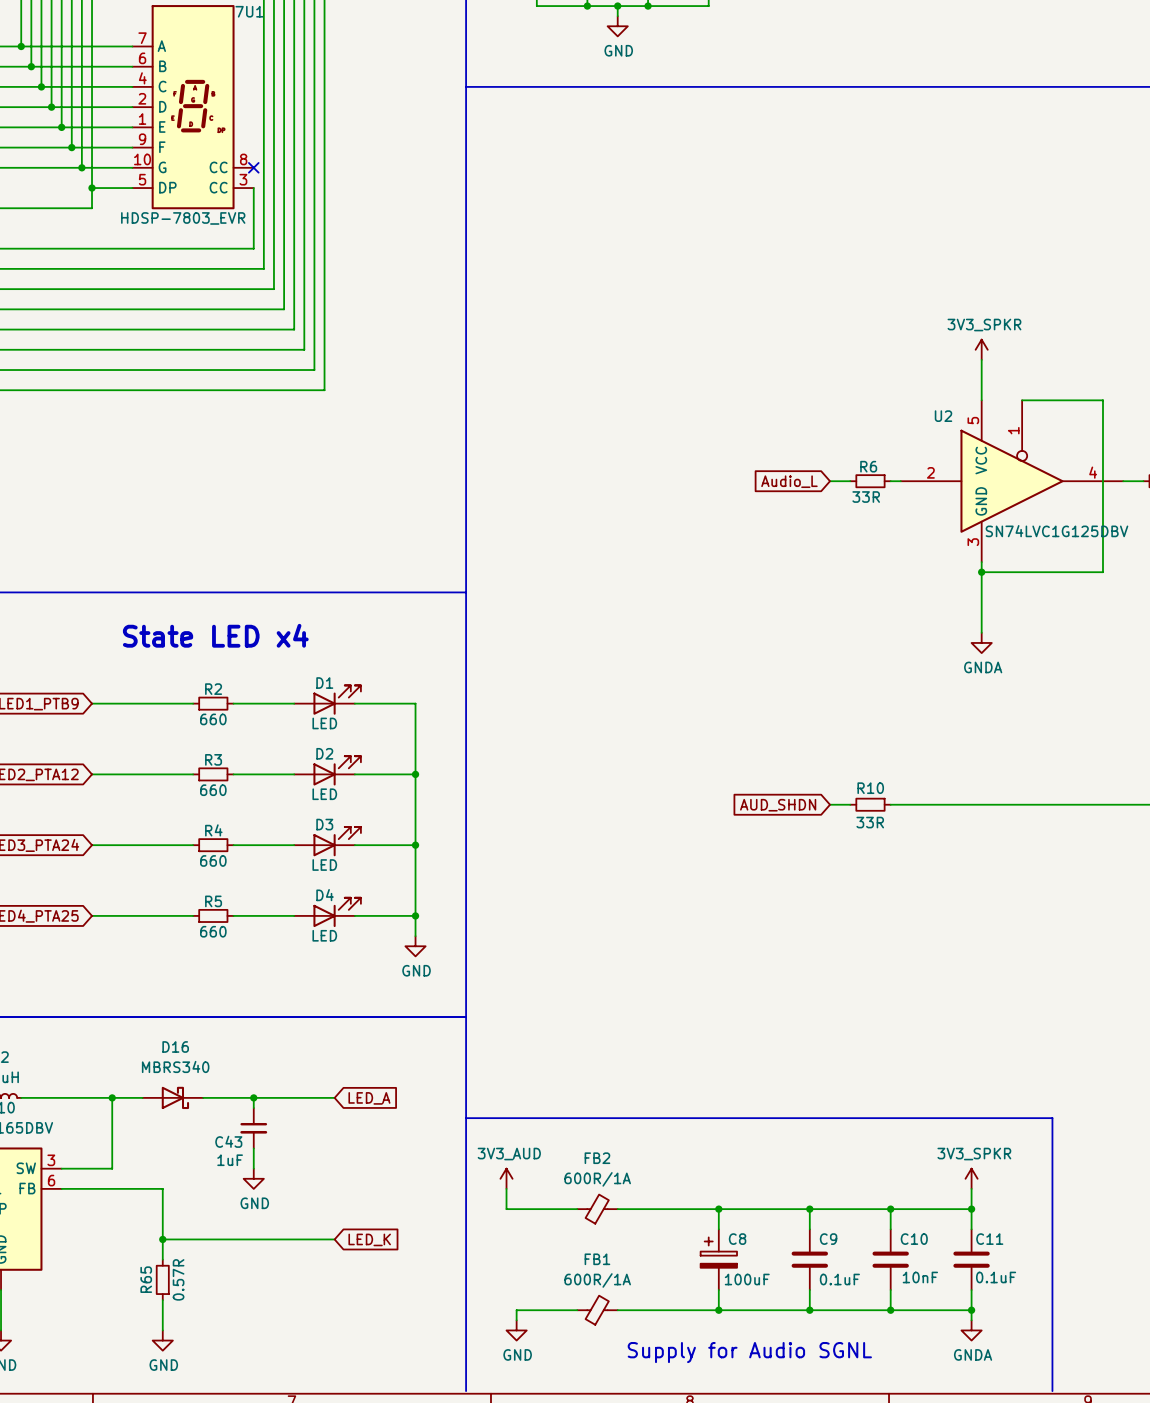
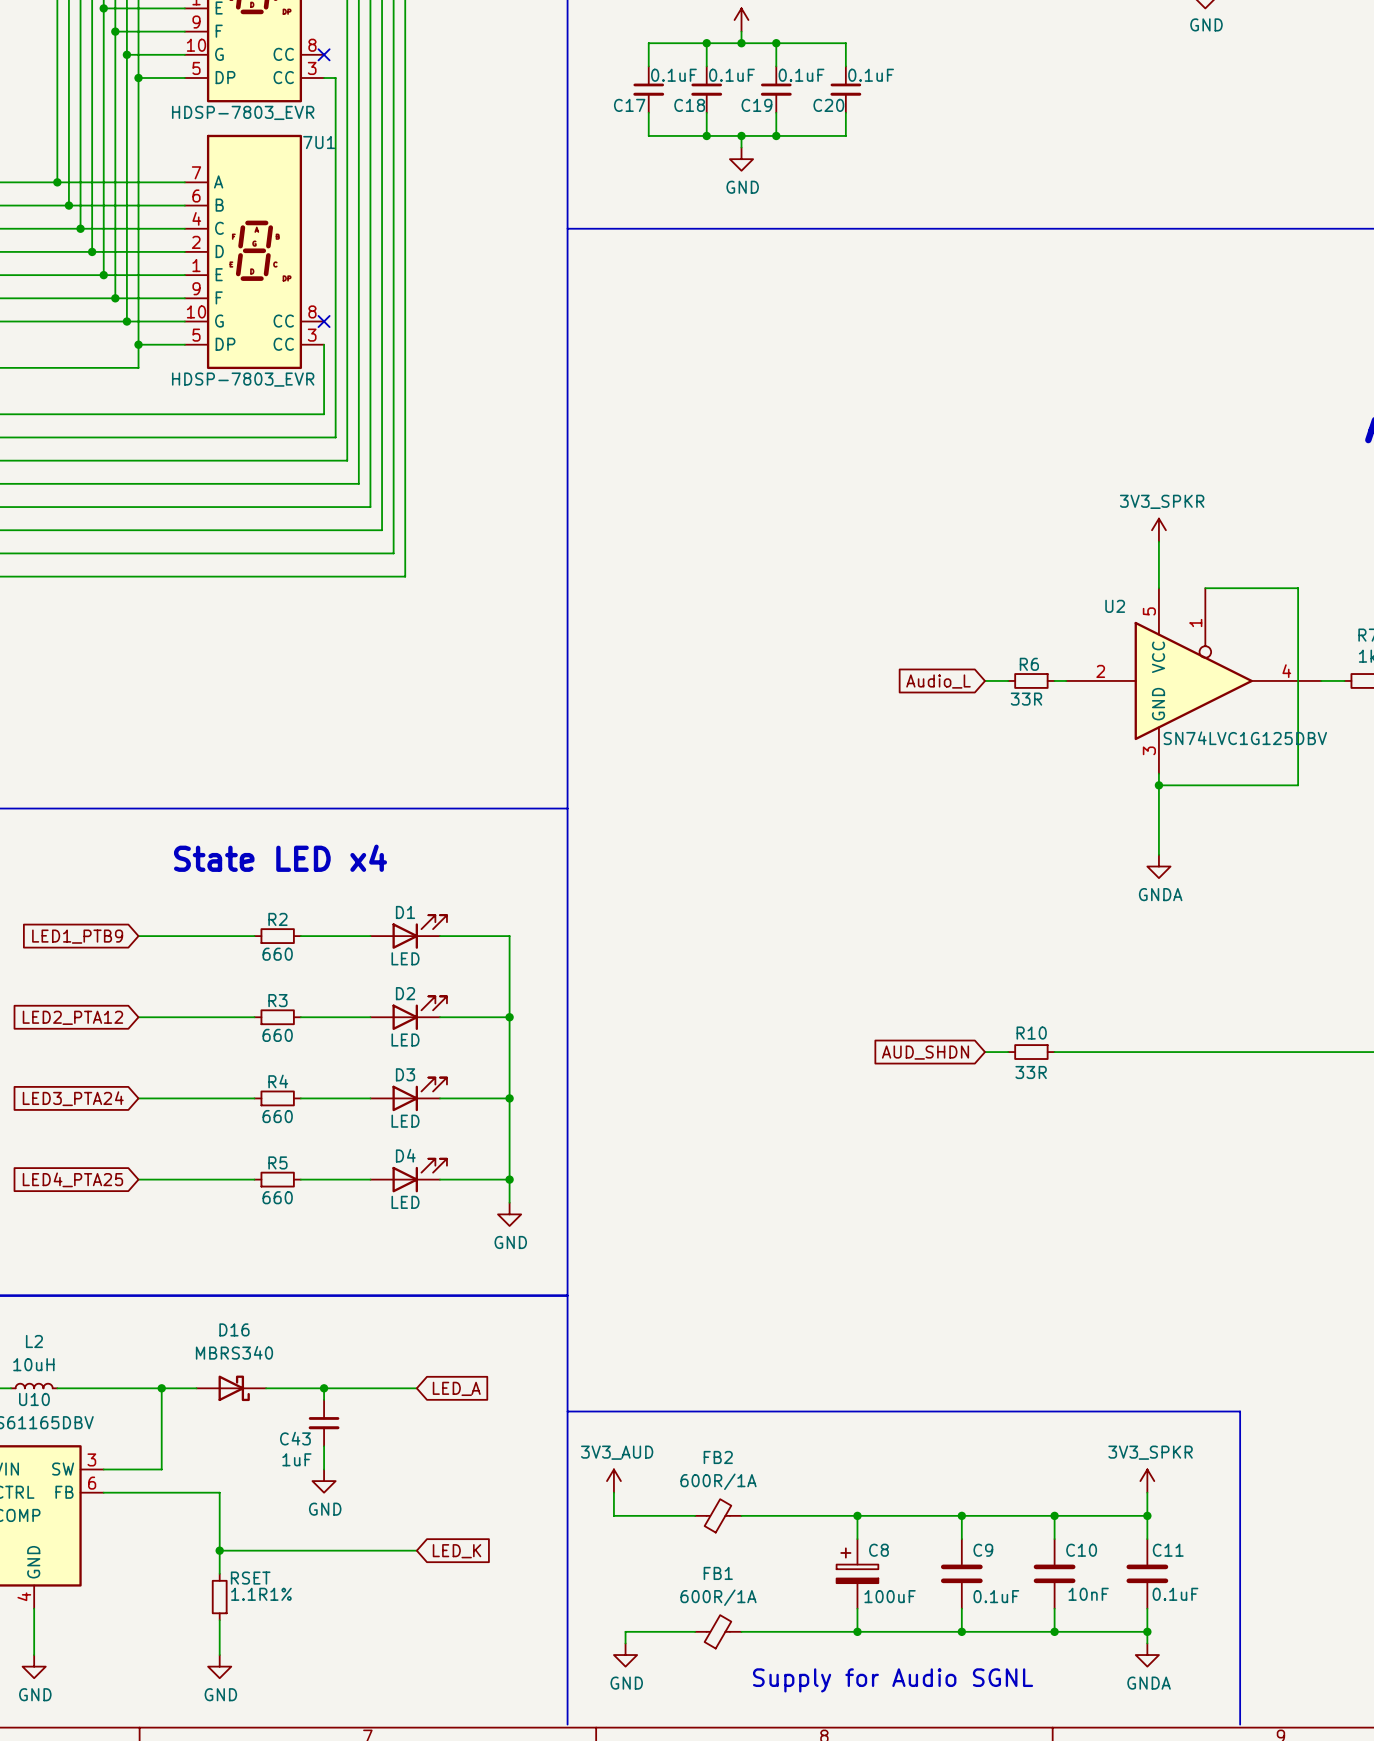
R65 name: R65 (146, 1279) -> RSET (250, 1578)
R65 value: 0.57R (178, 1279) -> 1.1R1% (261, 1594)

